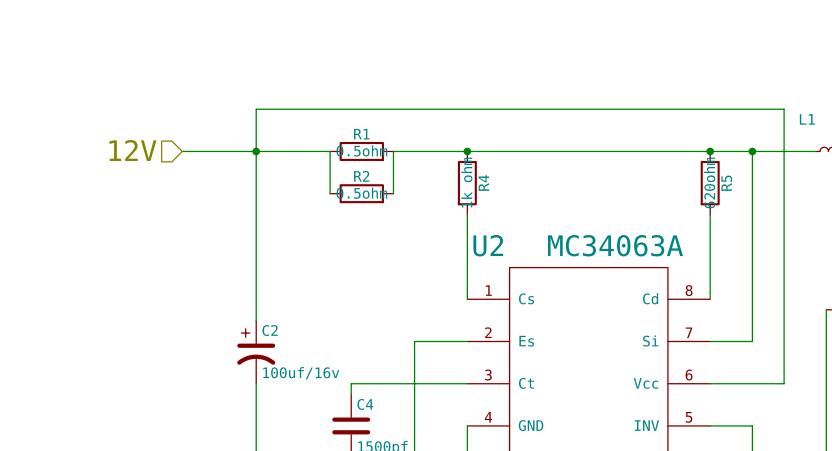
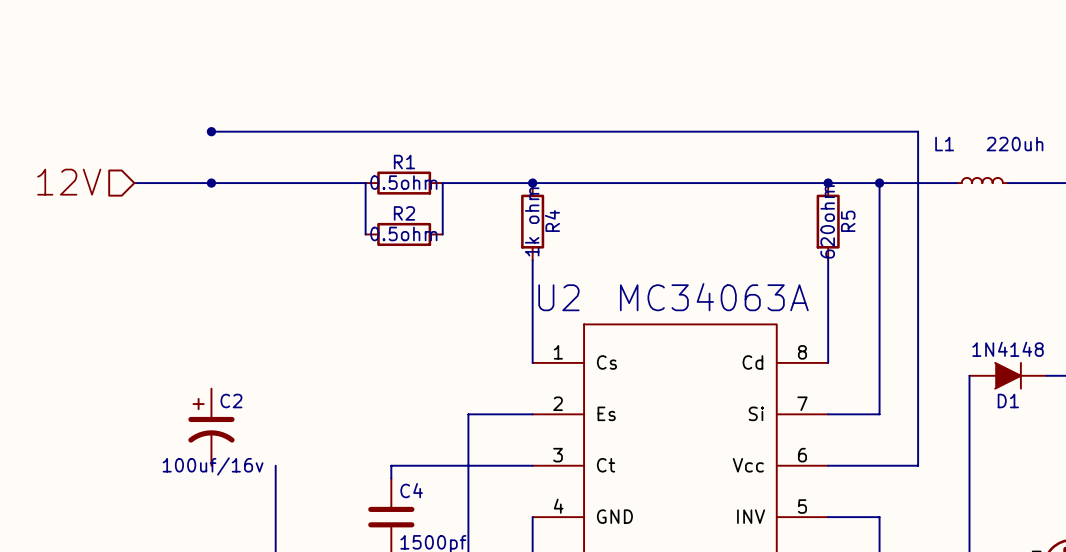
junction: none -> (211, 131)
wire: (256, 109) (256, 320) -> (275, 131) (211, 131)
hierarchical label position: 12V (132, 150) -> 12V (69, 182)
wire: none -> (134, 183) (185, 183)
junction: none -> (211, 183)
junction: (256, 151) -> none
C2 position: (256, 352) -> (211, 427)
C2 value position: 100uf/16v (301, 373) -> 100uf/16v (213, 466)

